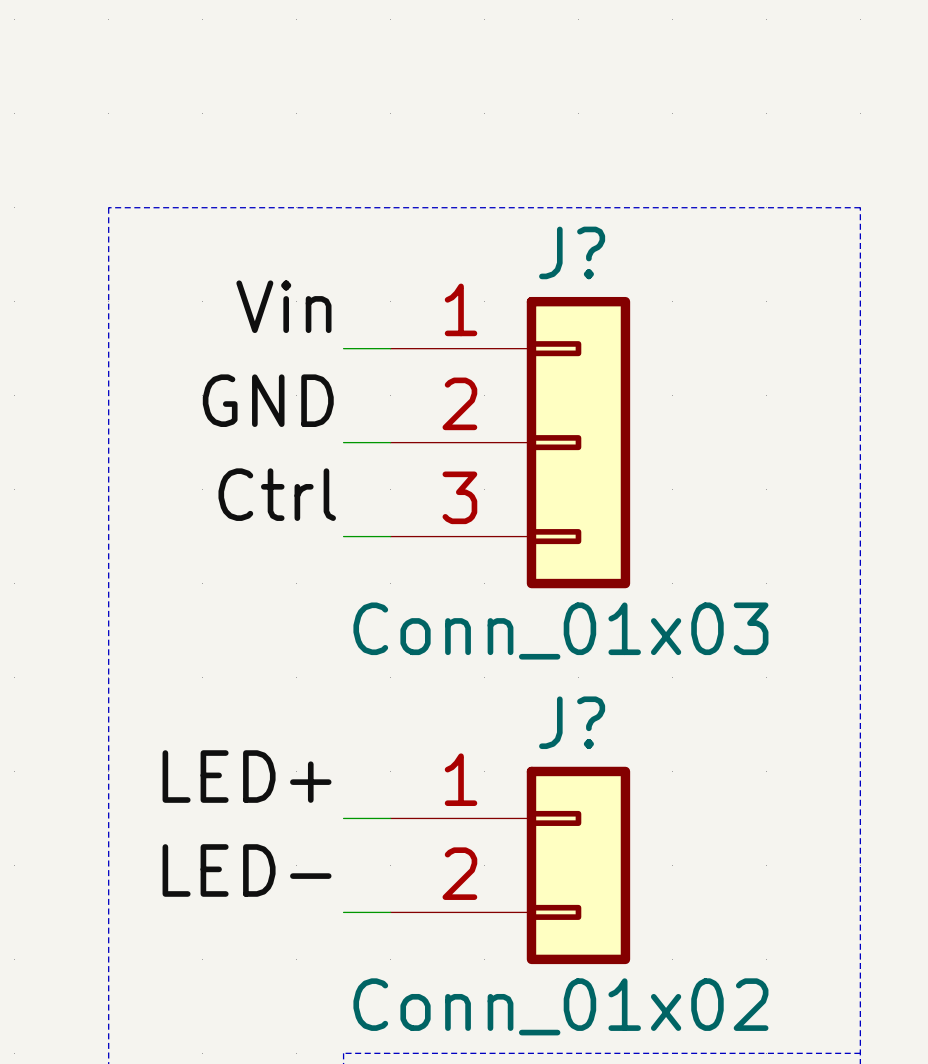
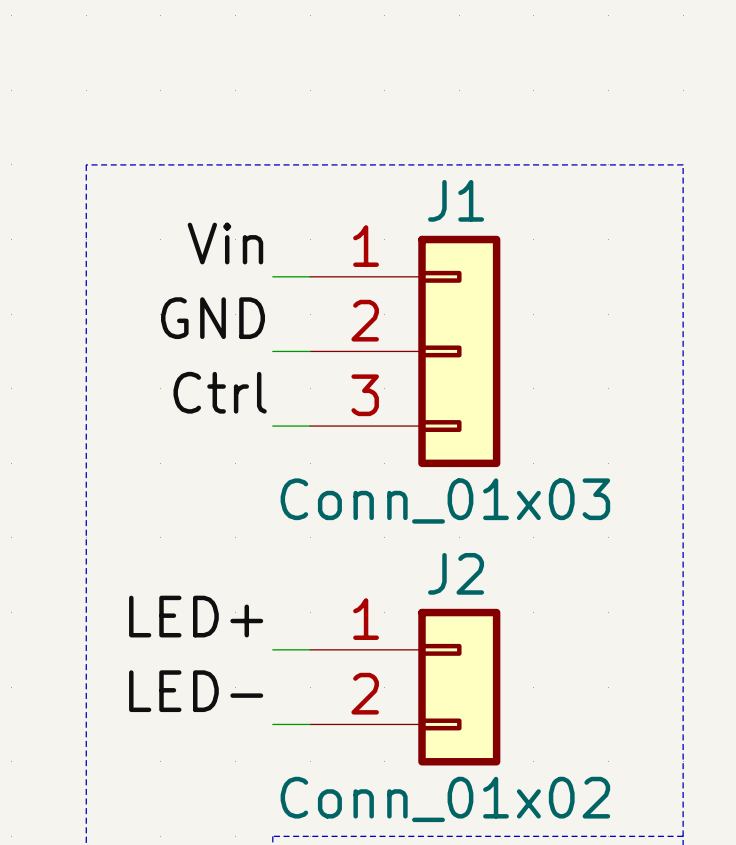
J? name: J? (572, 252) -> J1 (456, 200)
J? name: J? (572, 722) -> J2 (456, 573)

